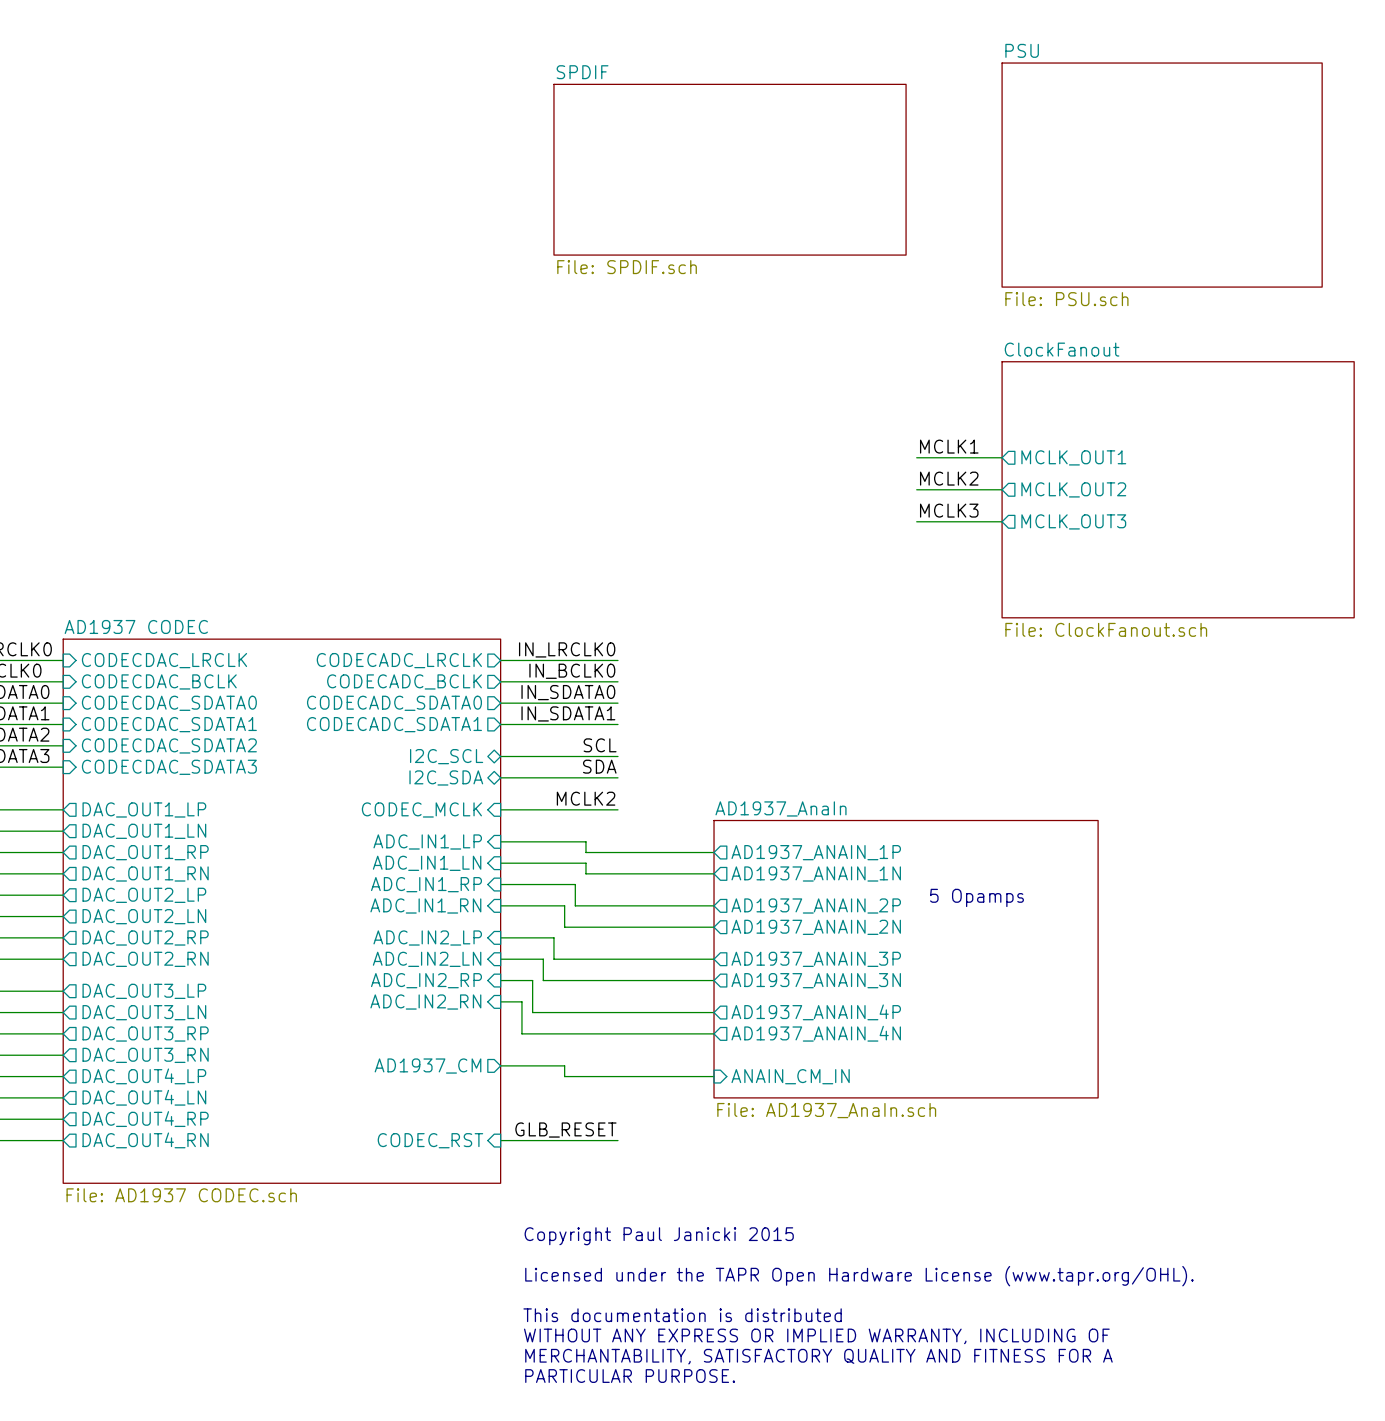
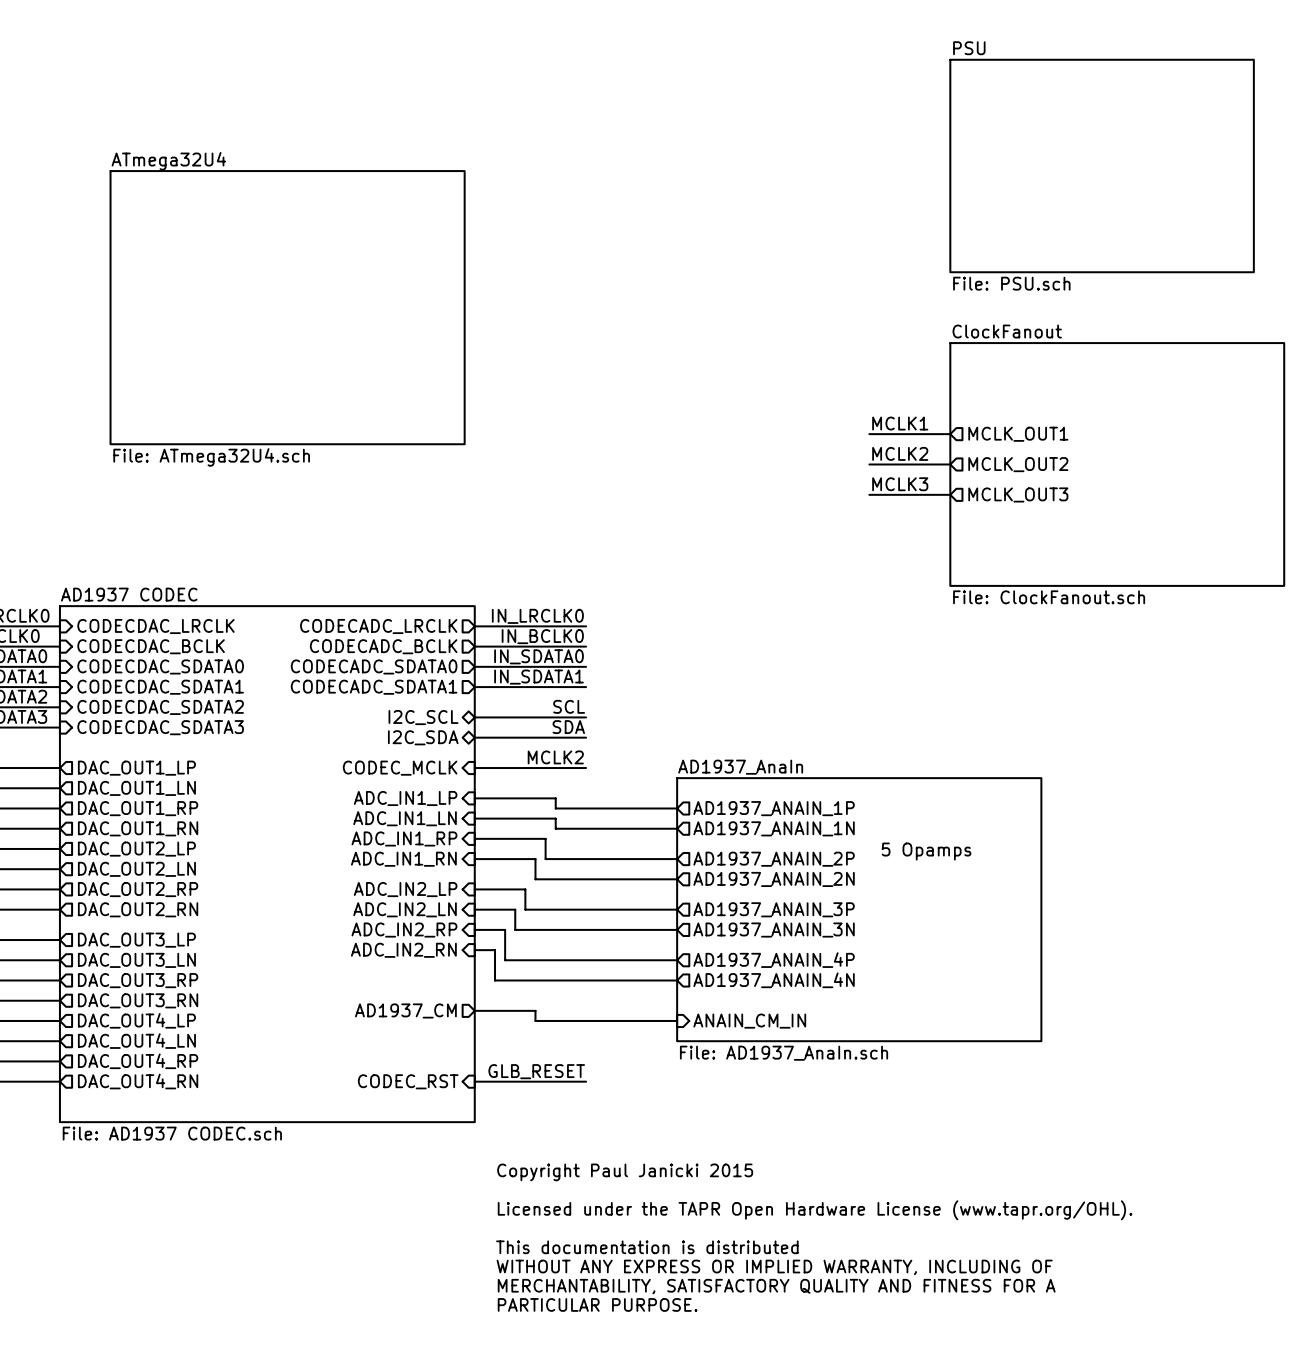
sheet SPDIF: File: SPDIF.sch (730, 169) -> none
sheet ATmega32U4: none -> File: ATmega32U4.sch (287, 307)

